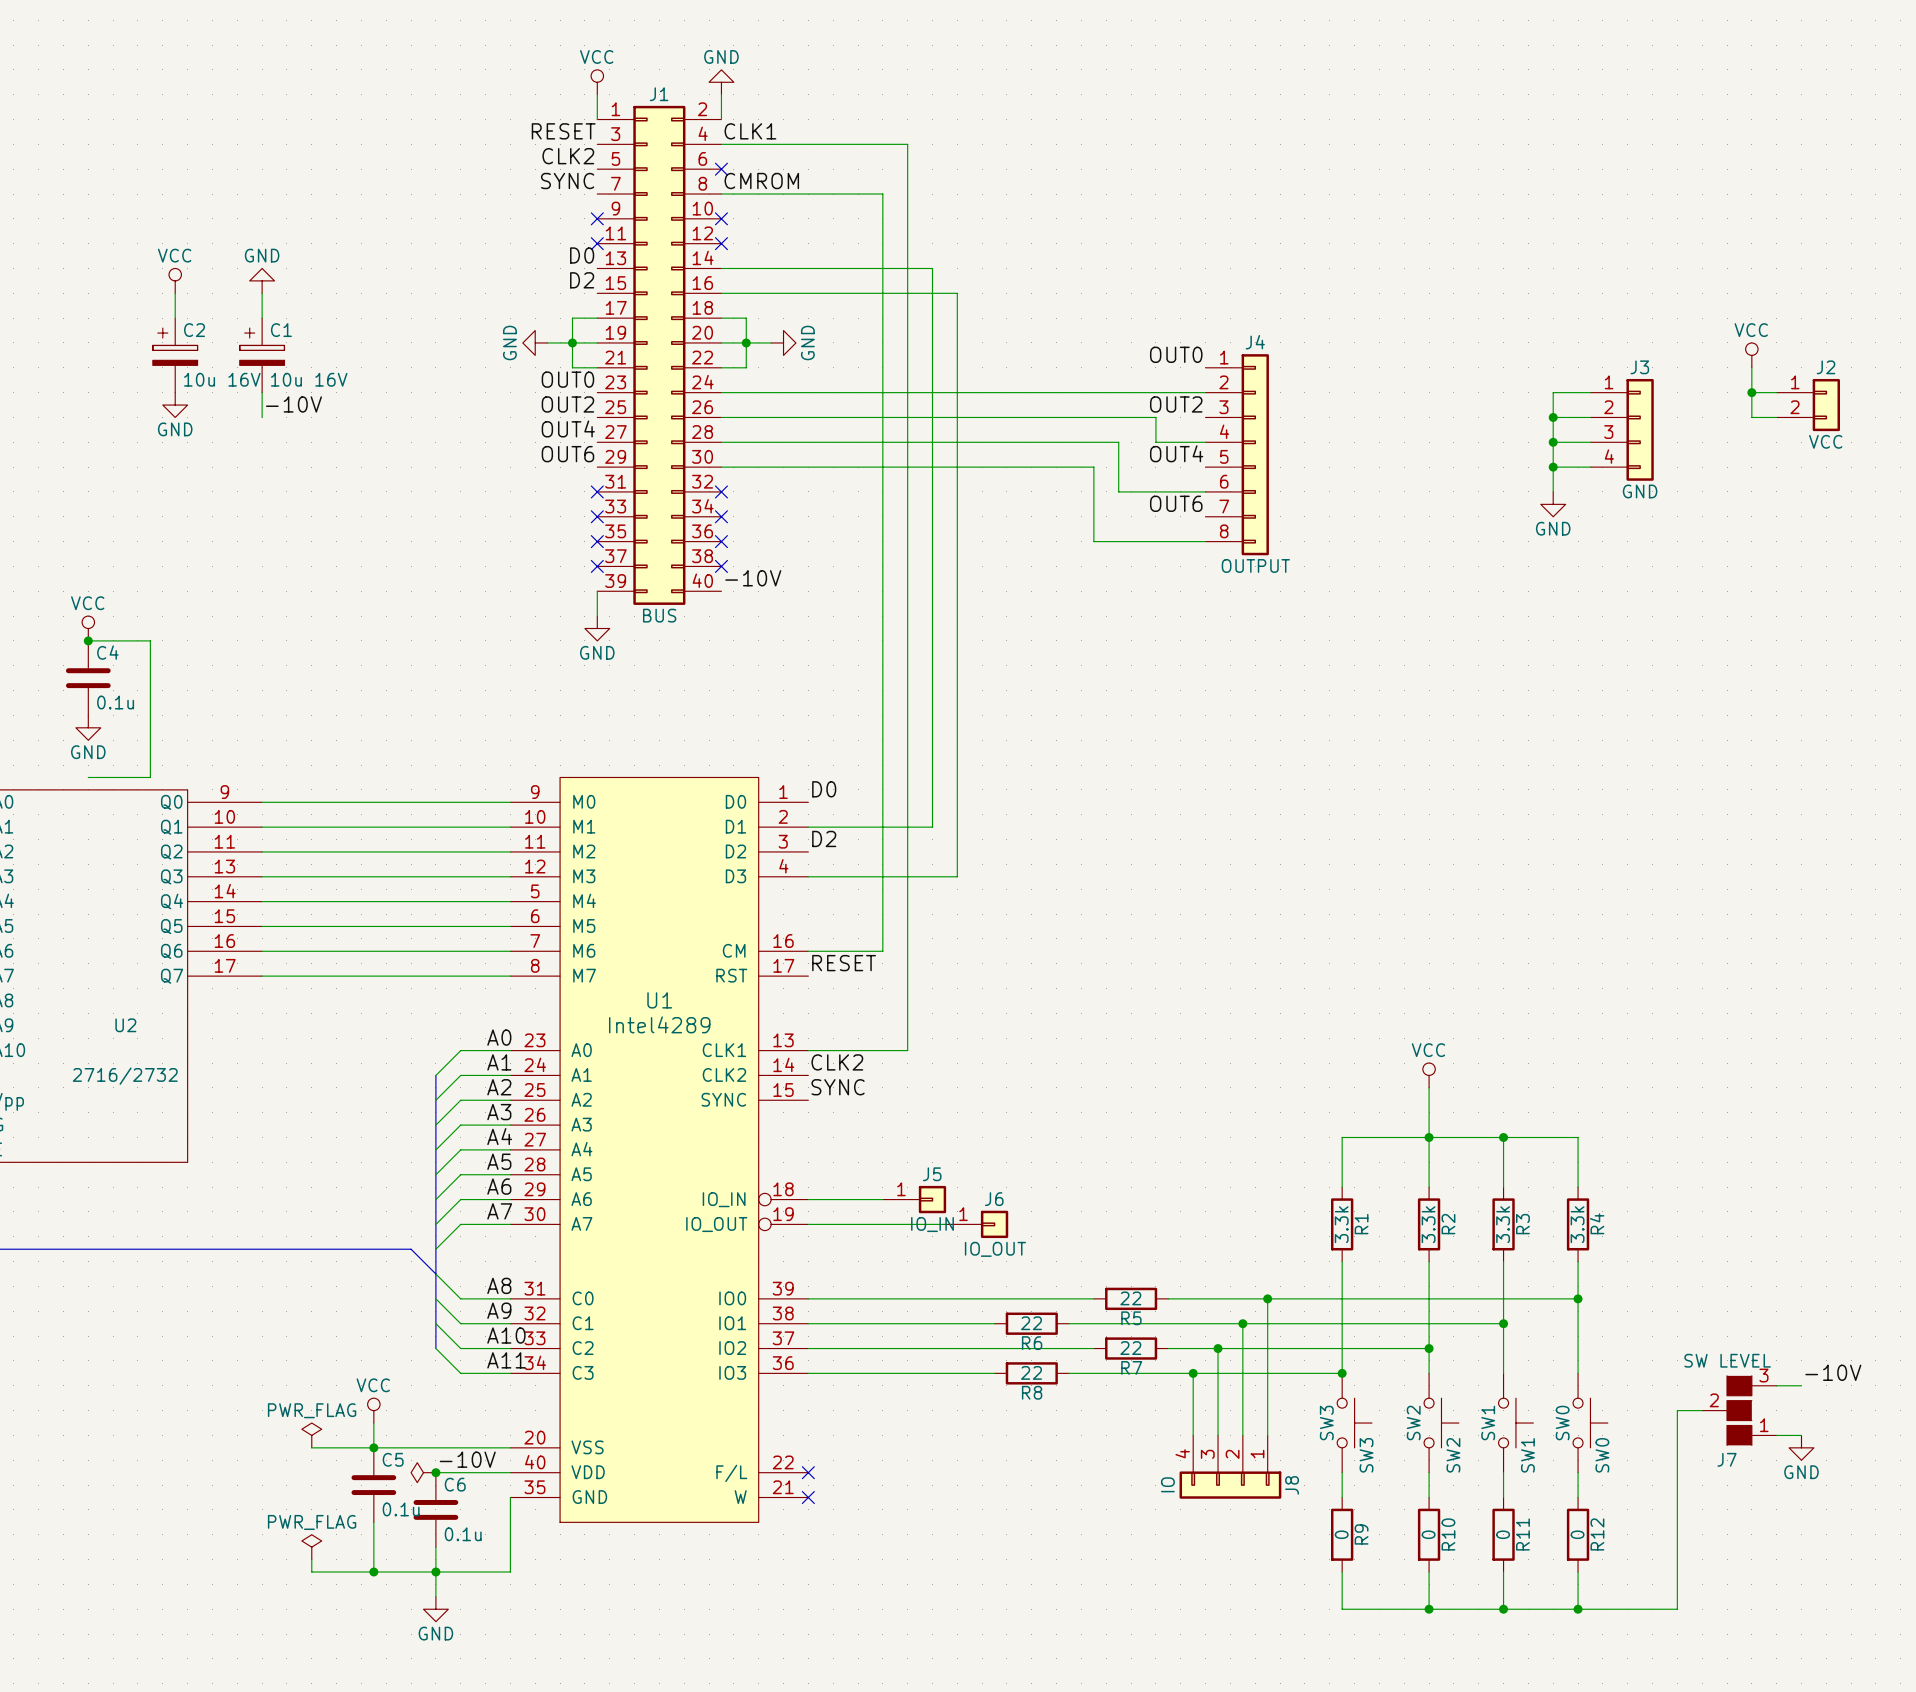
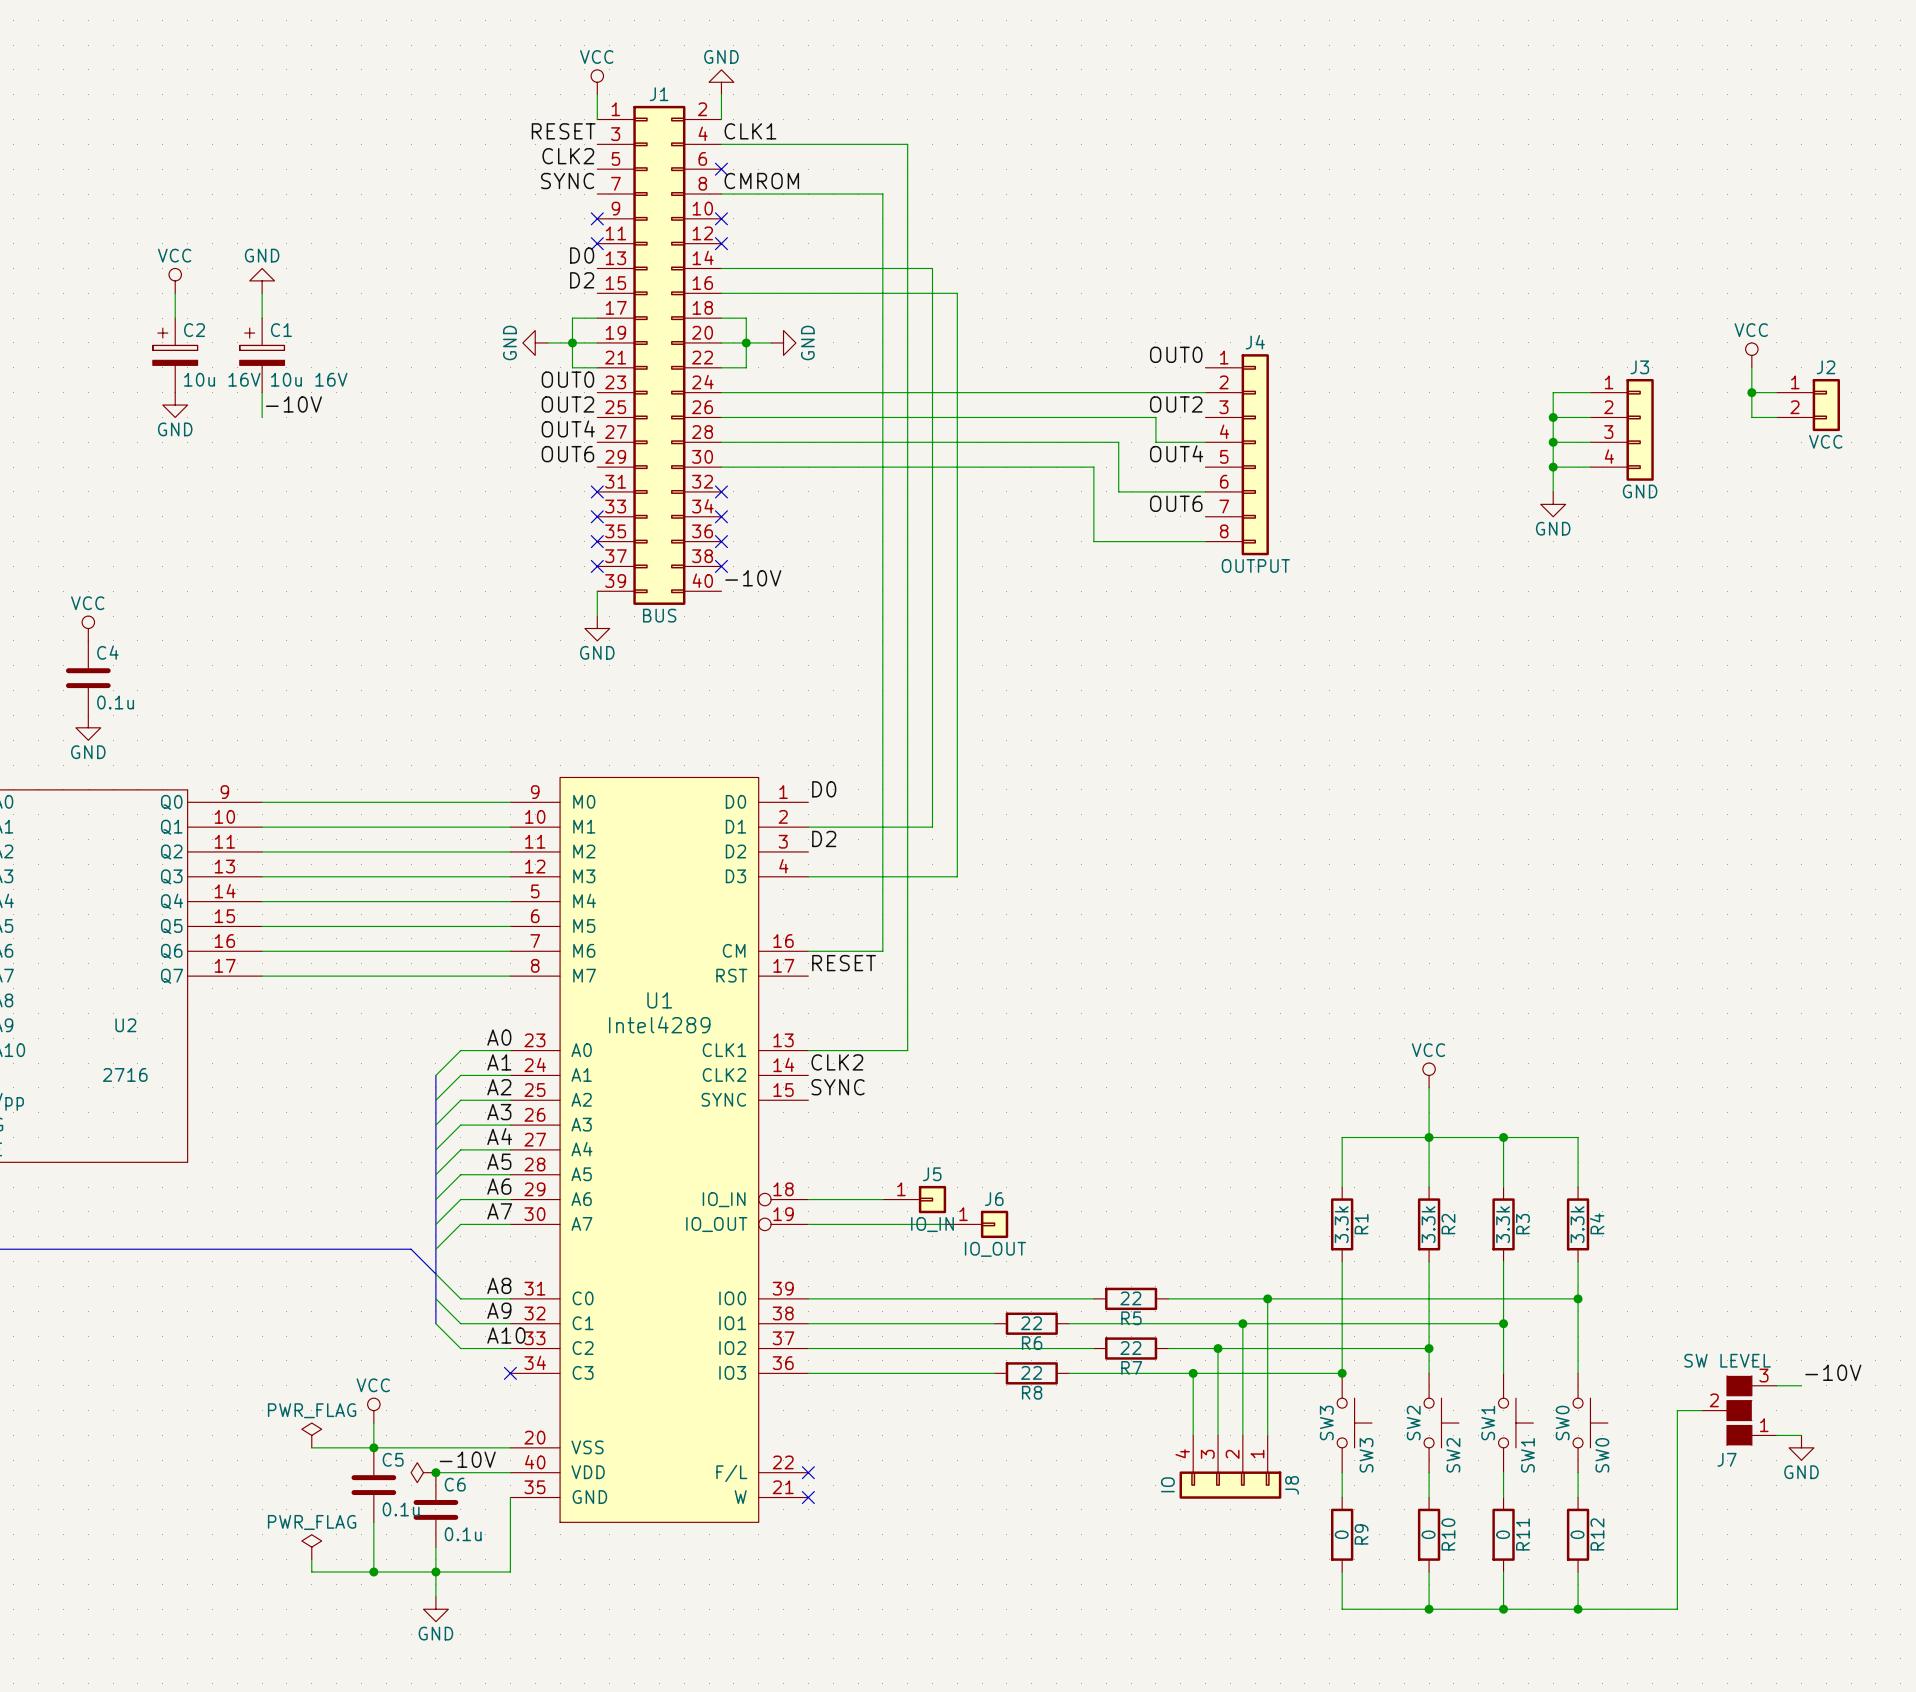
wire: (88, 640) (150, 640) (150, 777) (88, 777) -> none
junction: (88, 640) -> none
U2 value: 2716/2732 (125, 1076) -> 2716 (125, 1074)
bus: (435, 1323) (435, 1348) -> none
wire: (435, 1348) (460, 1373) (510, 1373) -> none
label: A11 (506, 1360) -> none
no-connect mark: none -> (510, 1373)

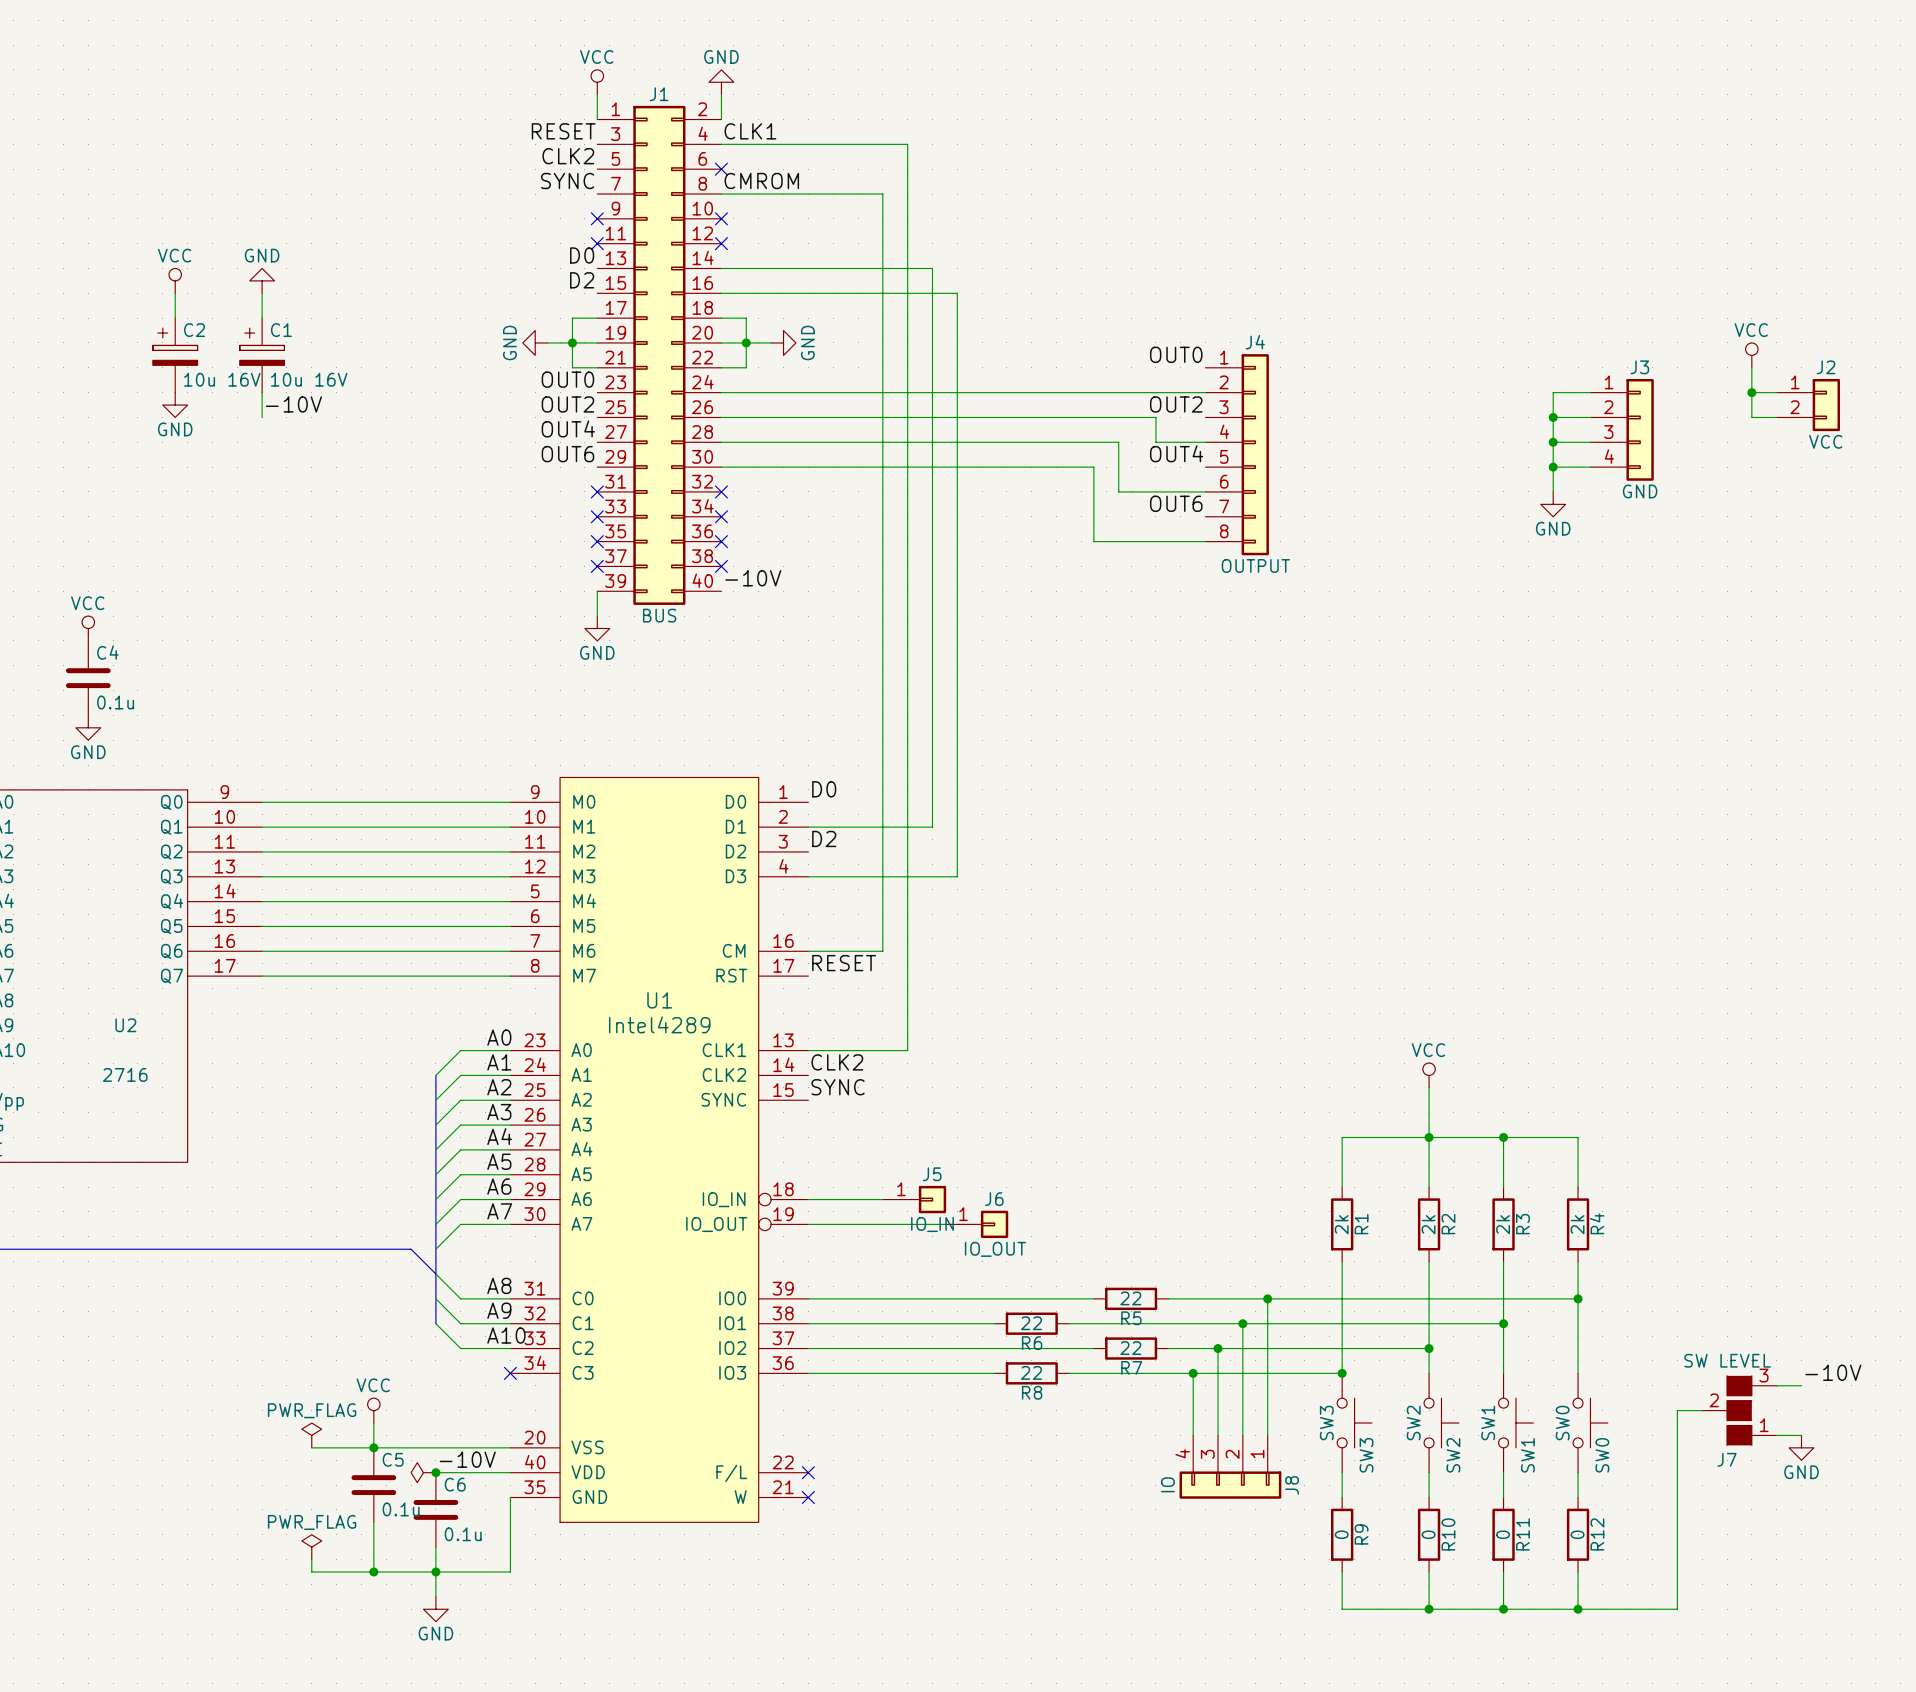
R1 value: 3.3k (1341, 1224) -> 2k (1341, 1224)
R2 value: 3.3k (1428, 1224) -> 2k (1428, 1224)
R3 value: 3.3k (1503, 1224) -> 2k (1503, 1224)
R4 value: 3.3k (1577, 1224) -> 2k (1577, 1224)

